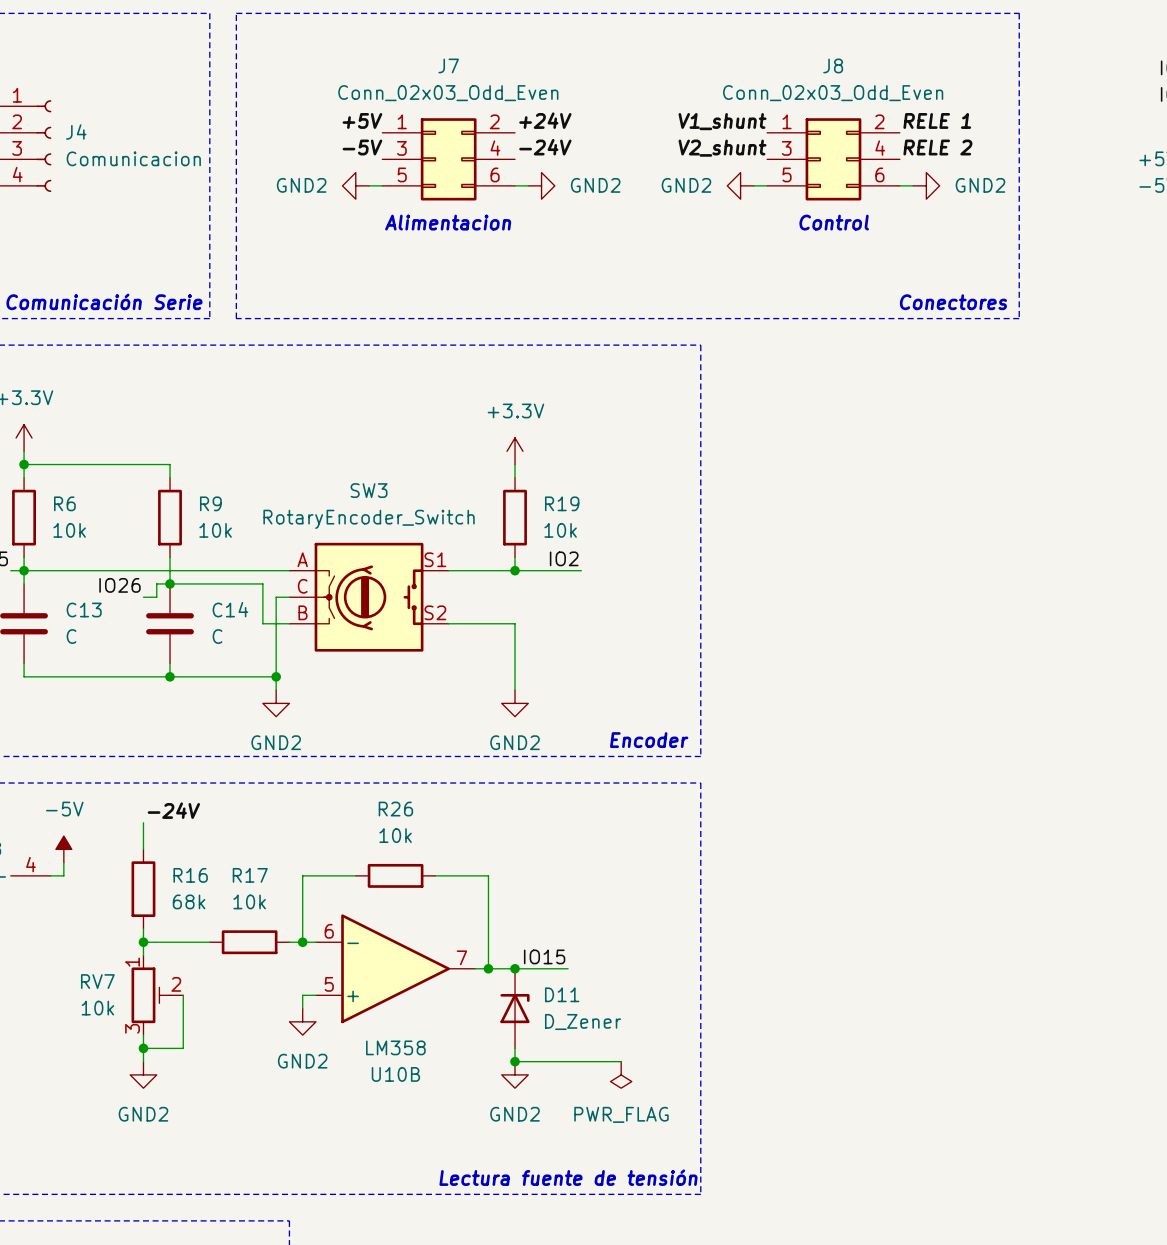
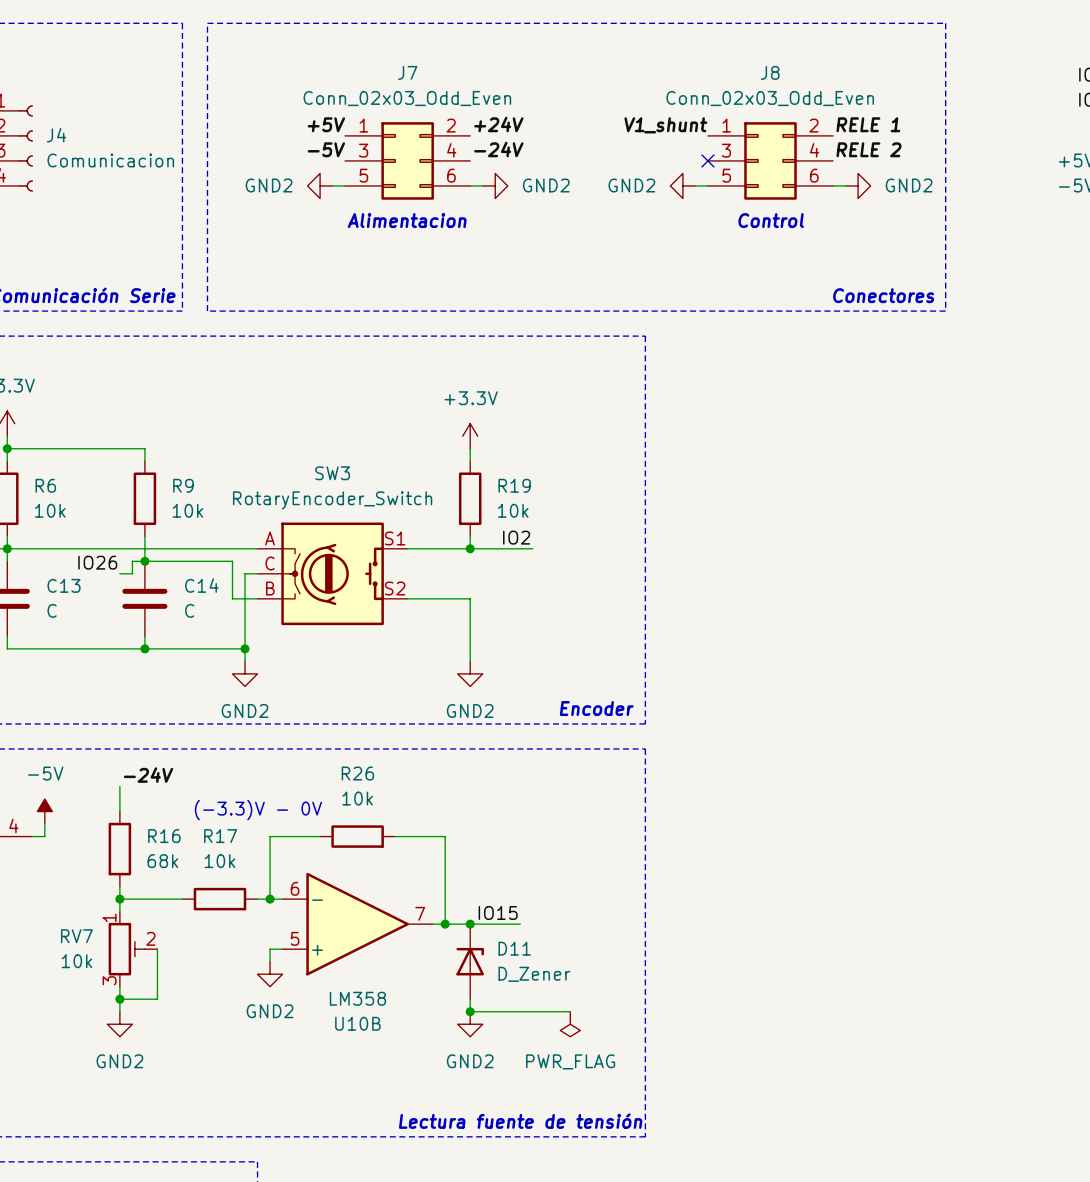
label: V2_shunt (722, 148) -> none
no-connect mark: none -> (707, 160)
text: none -> (-3.3)V - 0V (258, 810)

